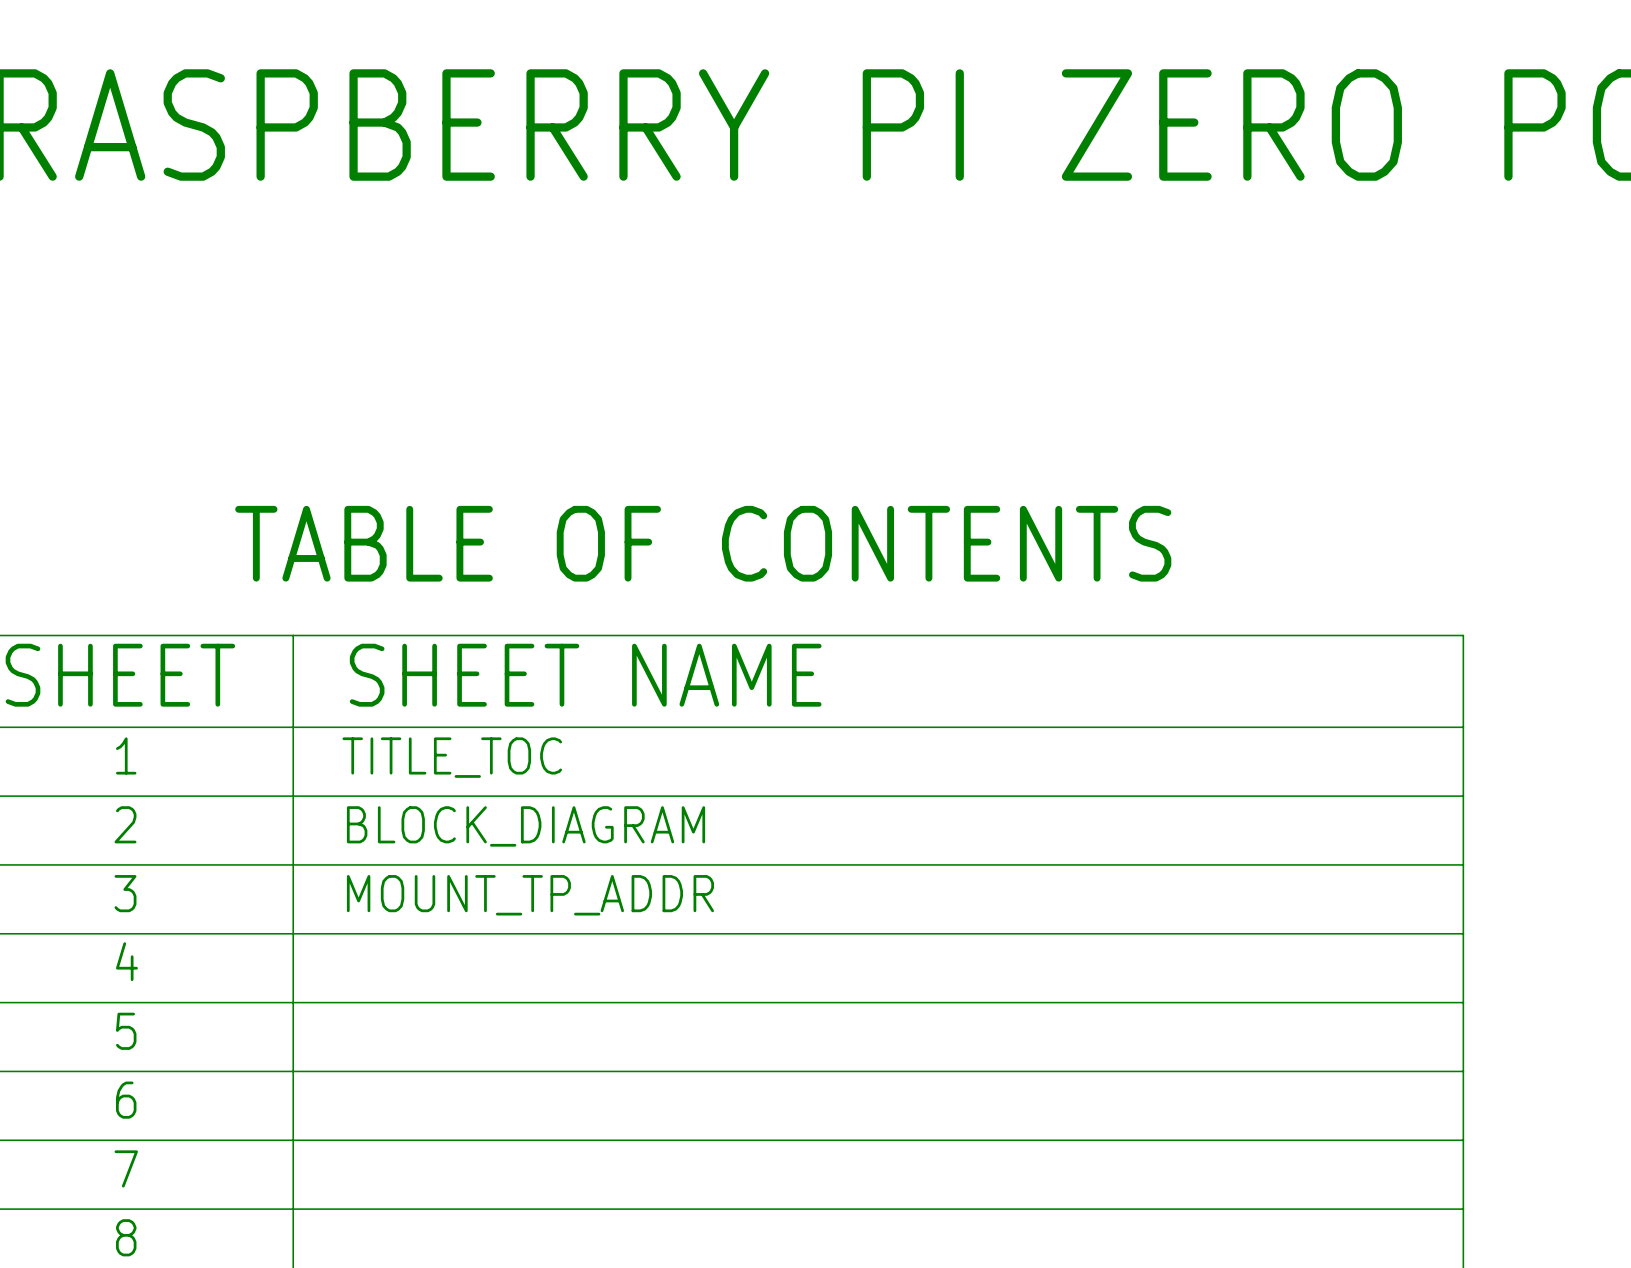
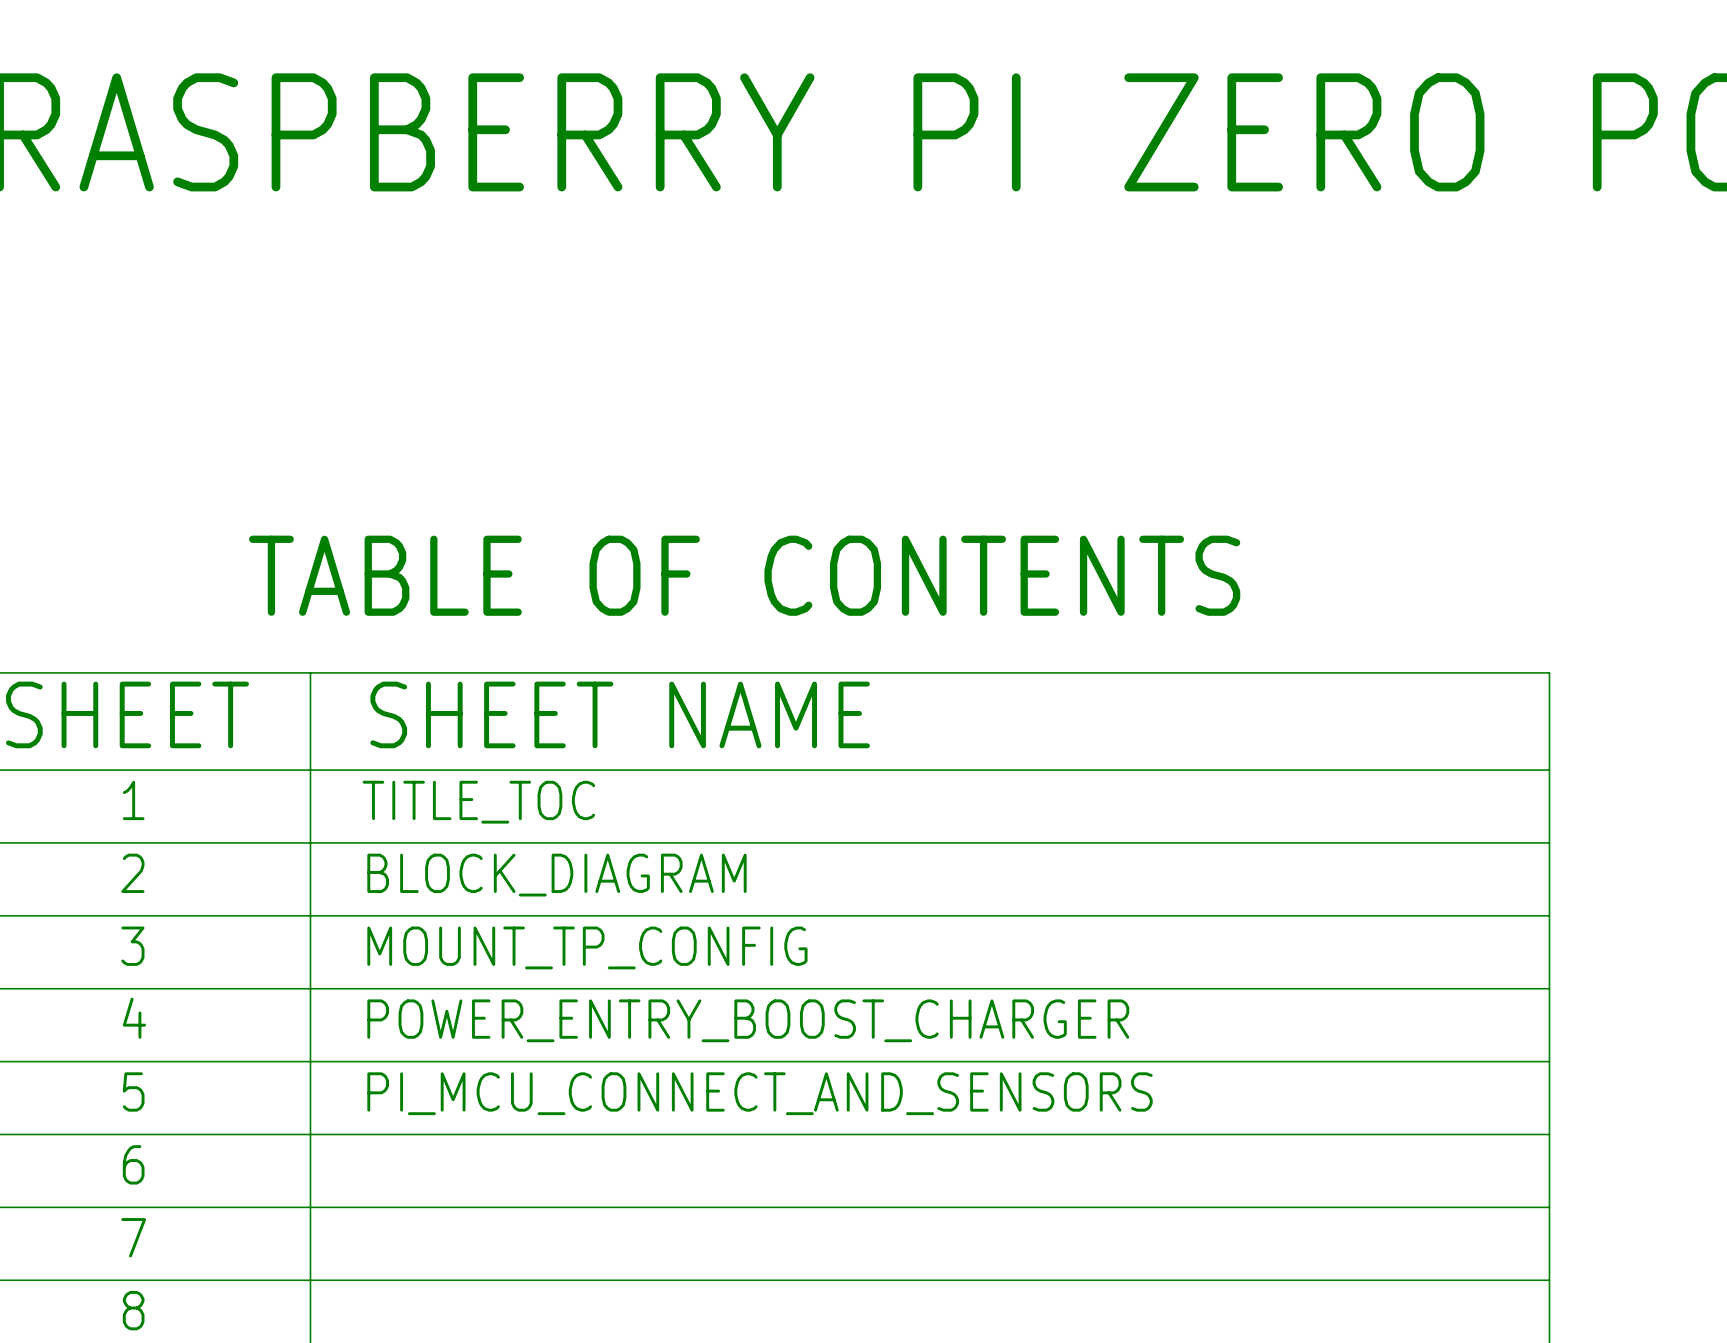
text: MOUNT_TP_ADDR (530, 895) -> MOUNT_TP_CONFIG (587, 947)
text: none -> POWER_ENTRY_BOOST_CHARGER (748, 1020)
text: none -> PI_MCU_CONNECT_AND_SENSORS (760, 1093)

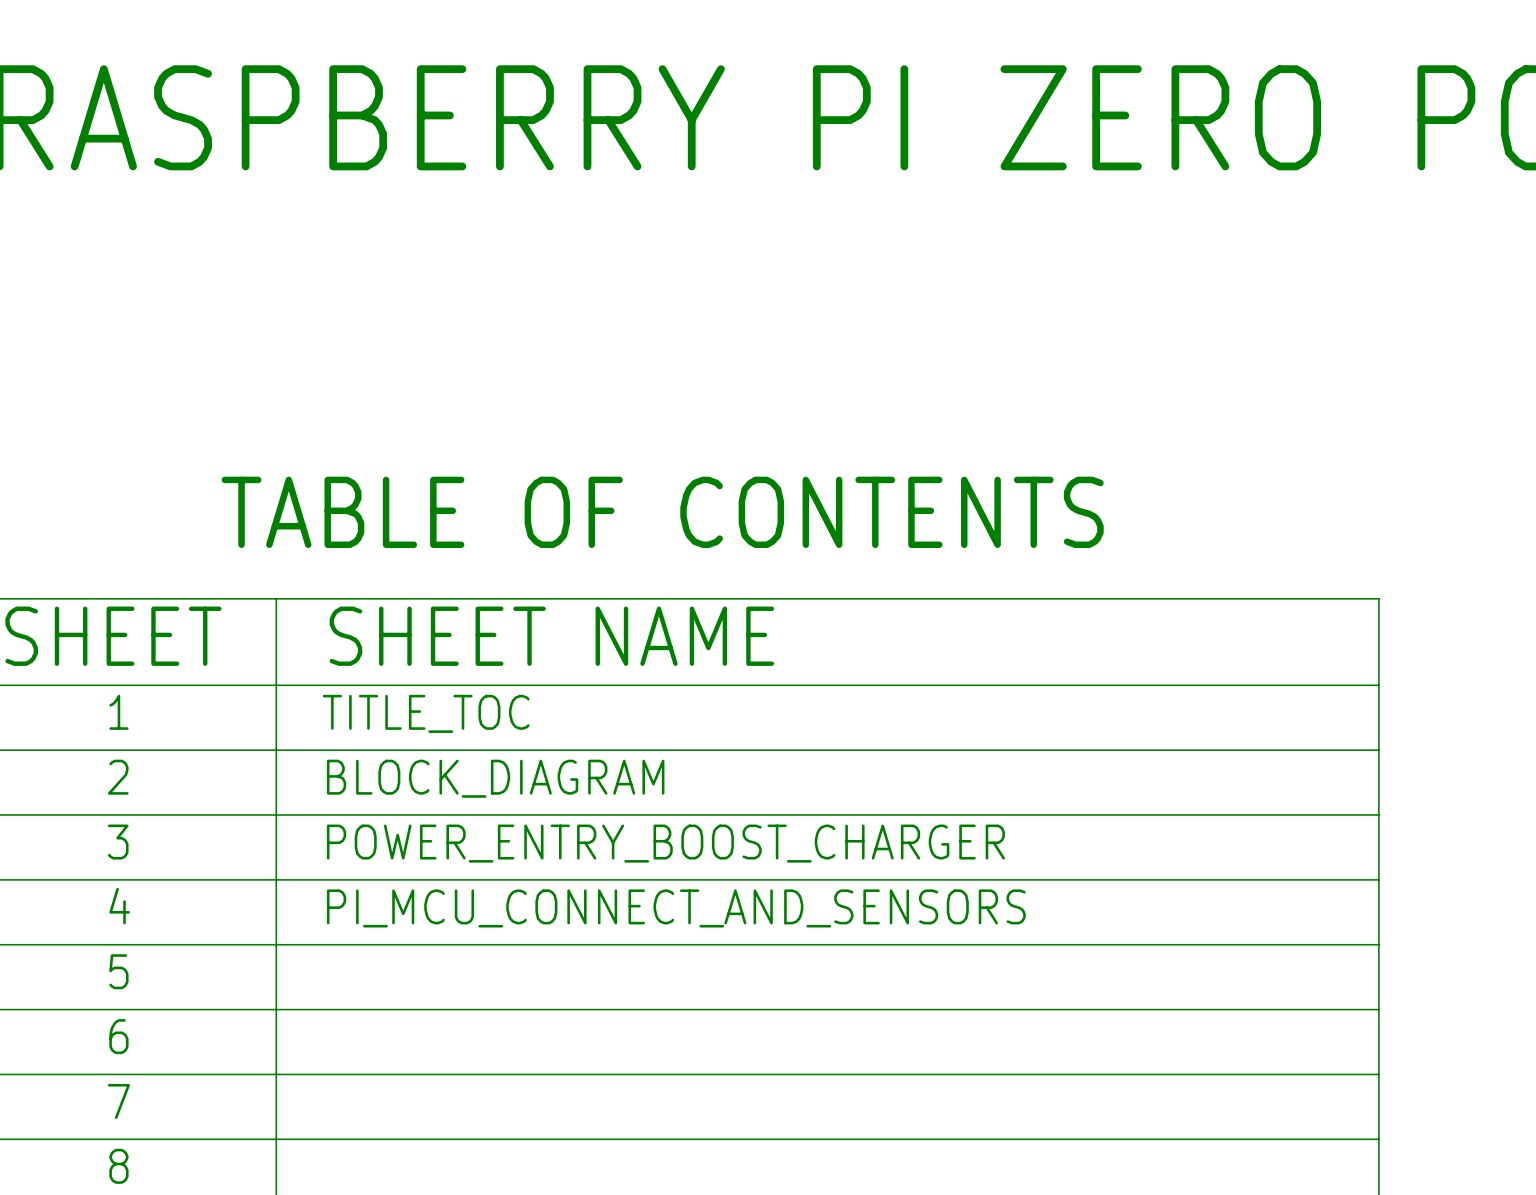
text: MOUNT_TP_CONFIG (587, 947) -> POWER_ENTRY_BOOST_CHARGER (665, 843)
text: POWER_ENTRY_BOOST_CHARGER (748, 1020) -> PI_MCU_CONNECT_AND_SENSORS (676, 908)
text: PI_MCU_CONNECT_AND_SENSORS (760, 1093) -> none

